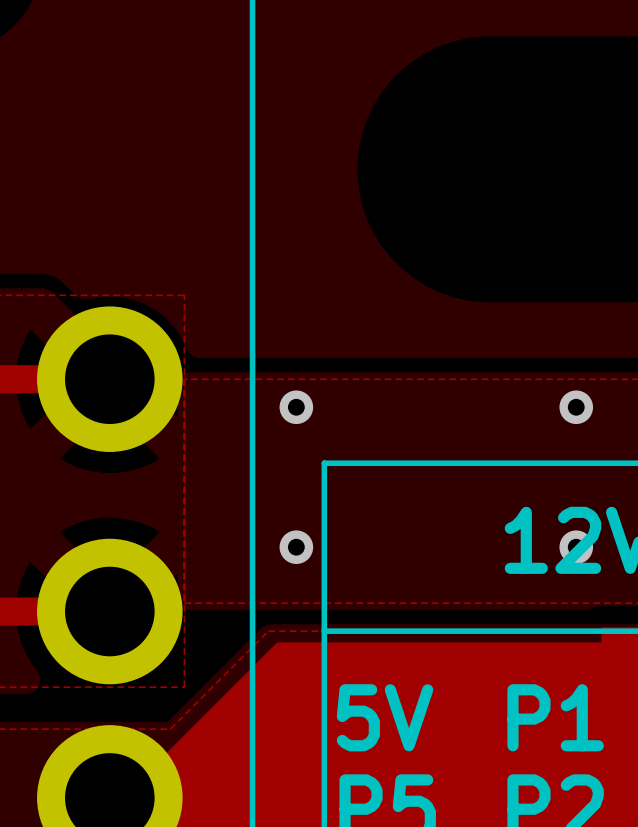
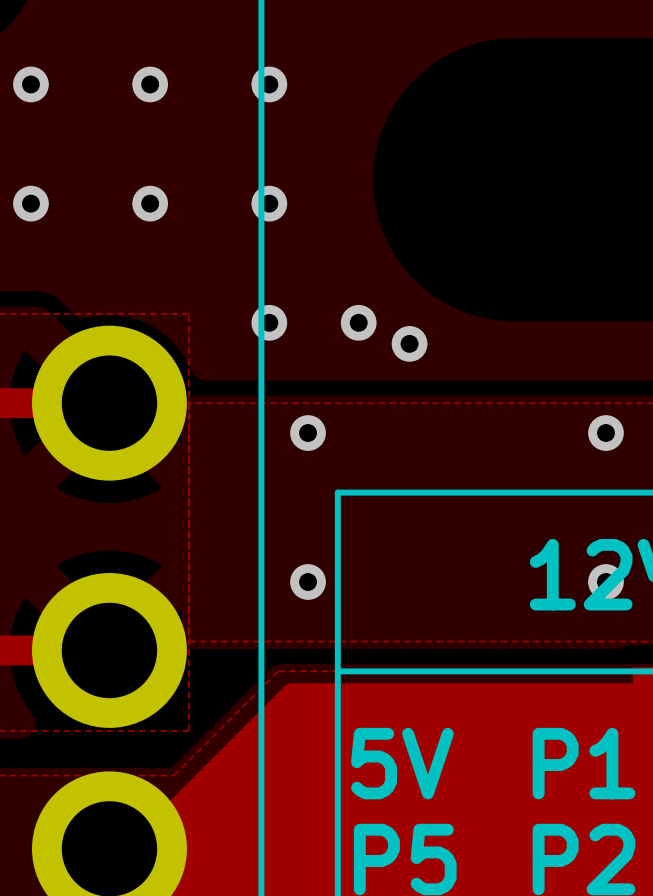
via: none -> (30, 84)
via: none -> (150, 84)
via: none -> (269, 84)
via: none -> (30, 203)
via: none -> (150, 203)
via: none -> (269, 203)
via: none -> (269, 322)
via: none -> (358, 322)
via: none -> (409, 343)

